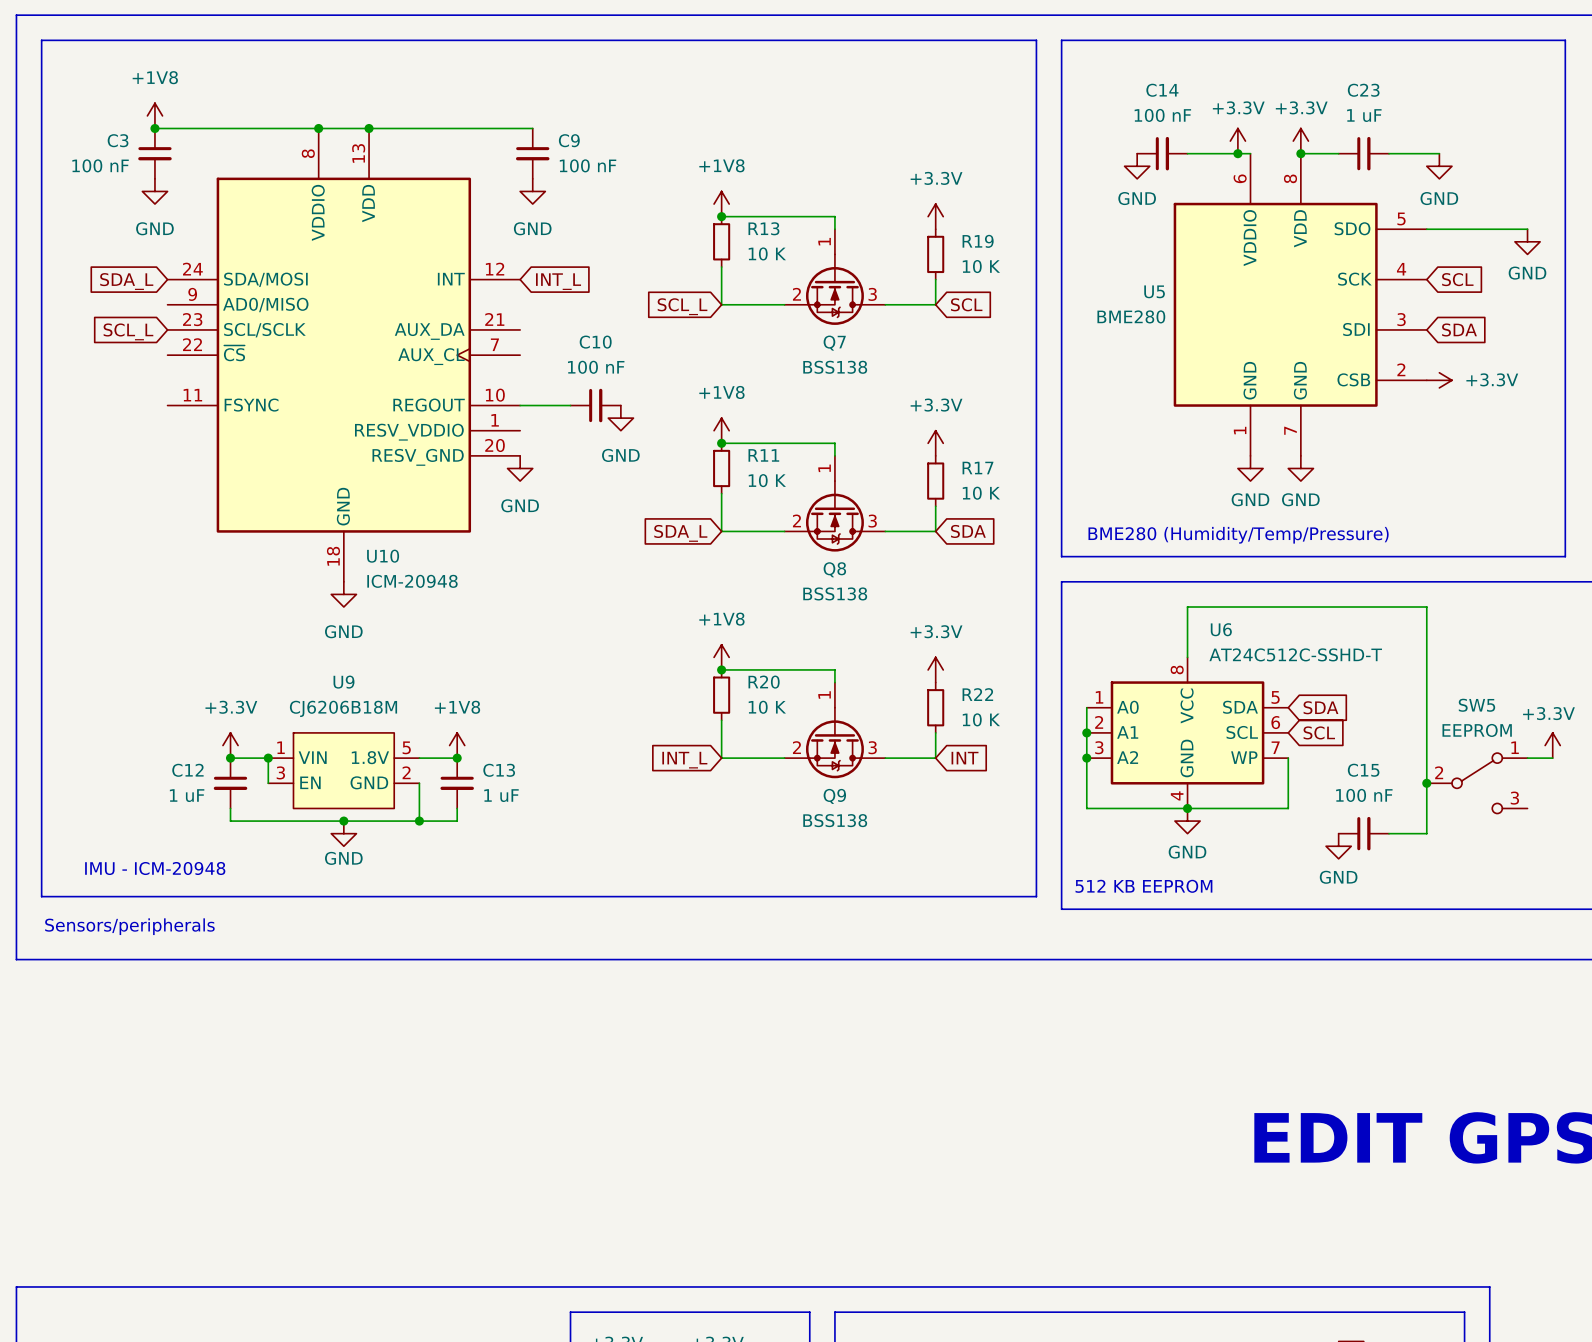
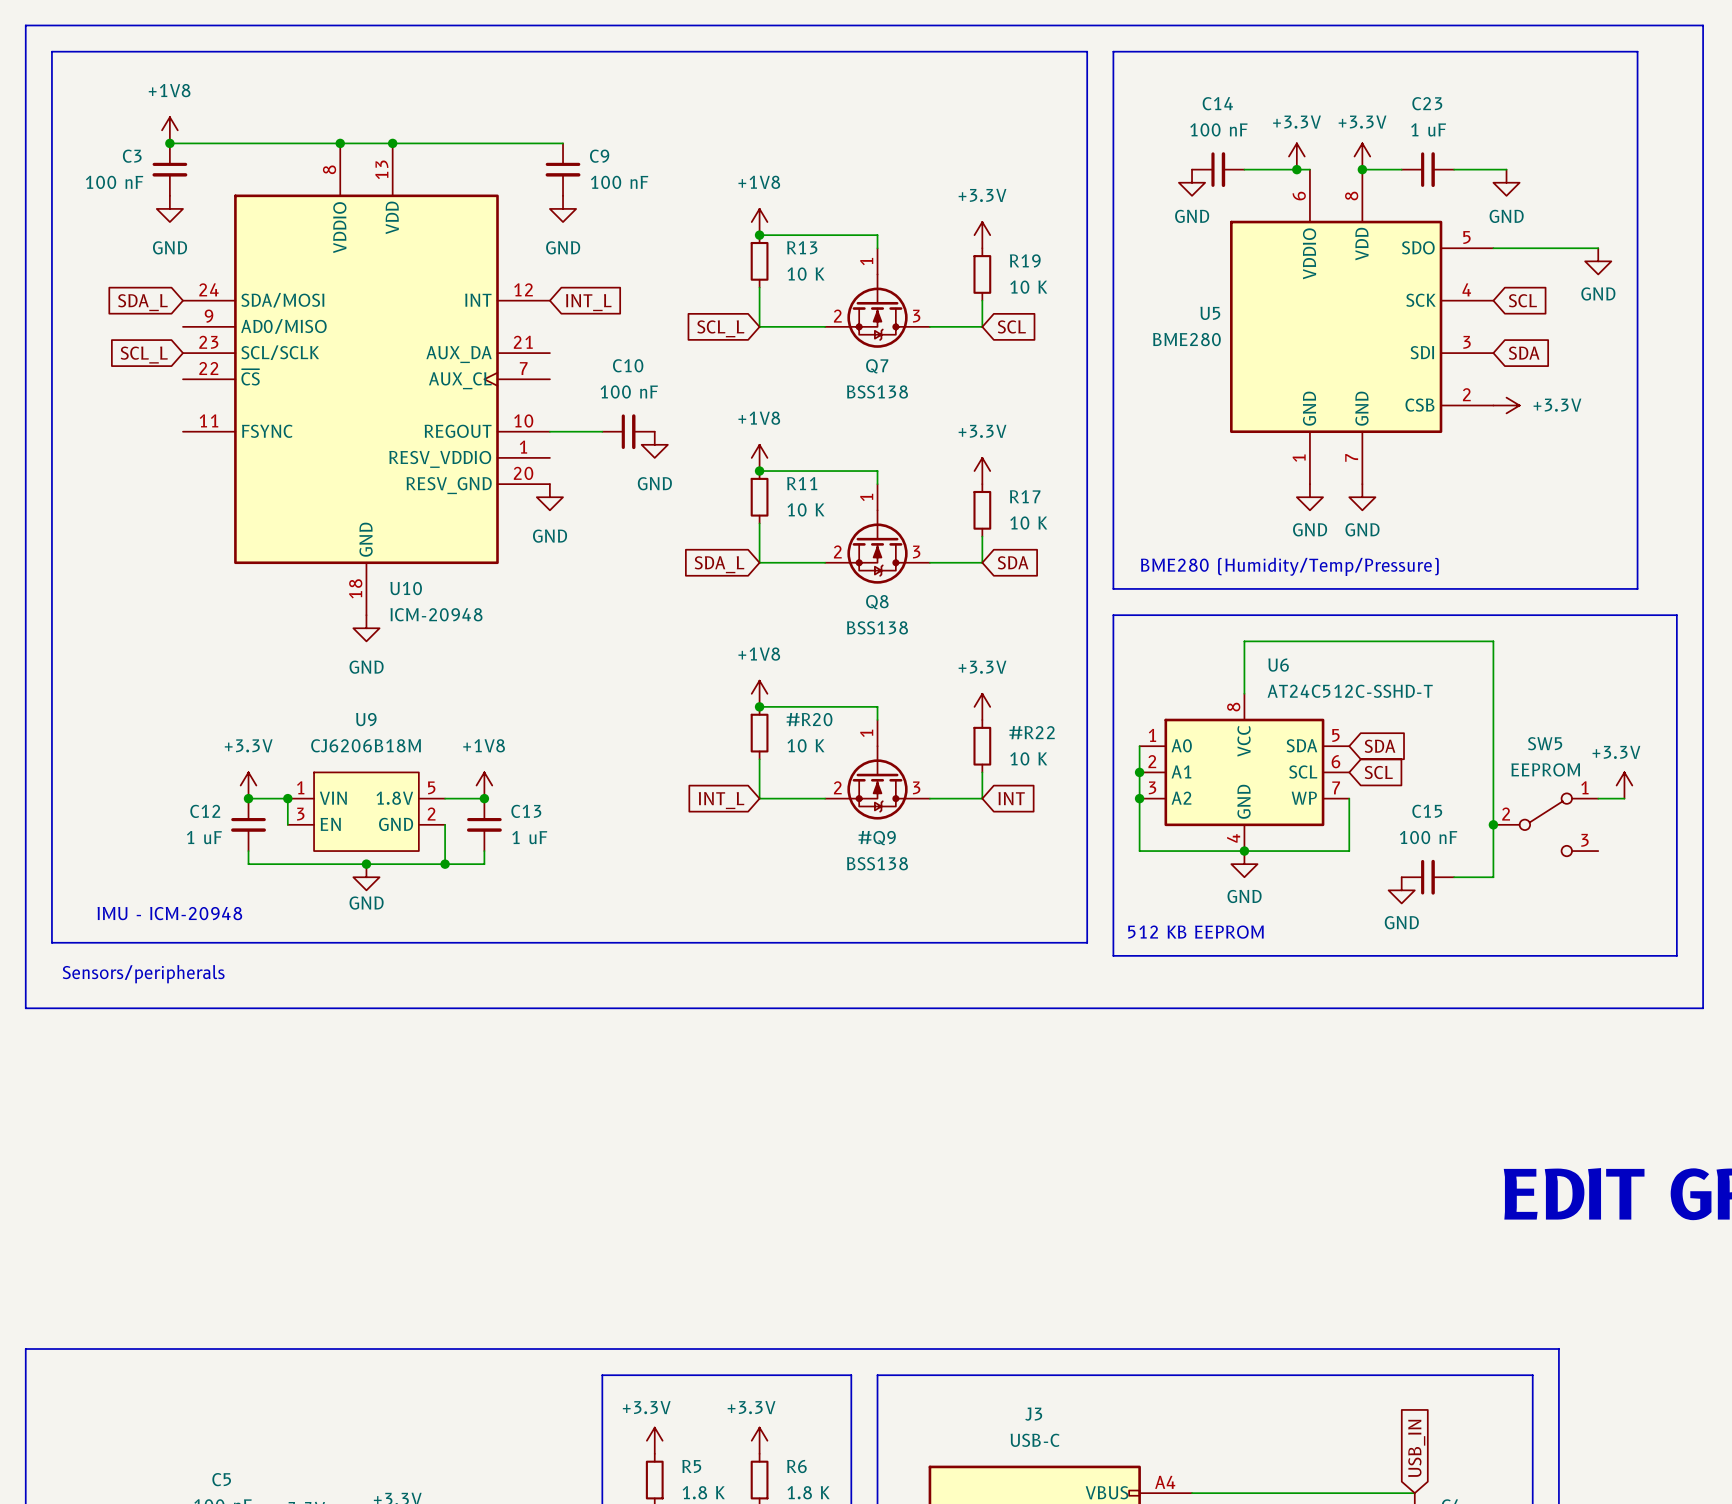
R20: 10 K (721, 695) -> none
#R20: none -> 10 K (759, 733)
R22: 10 K (935, 707) -> none
#R22: none -> 10 K (982, 746)
Q9: BSS138 (834, 730) -> none
#Q9: none -> BSS138 (877, 769)

